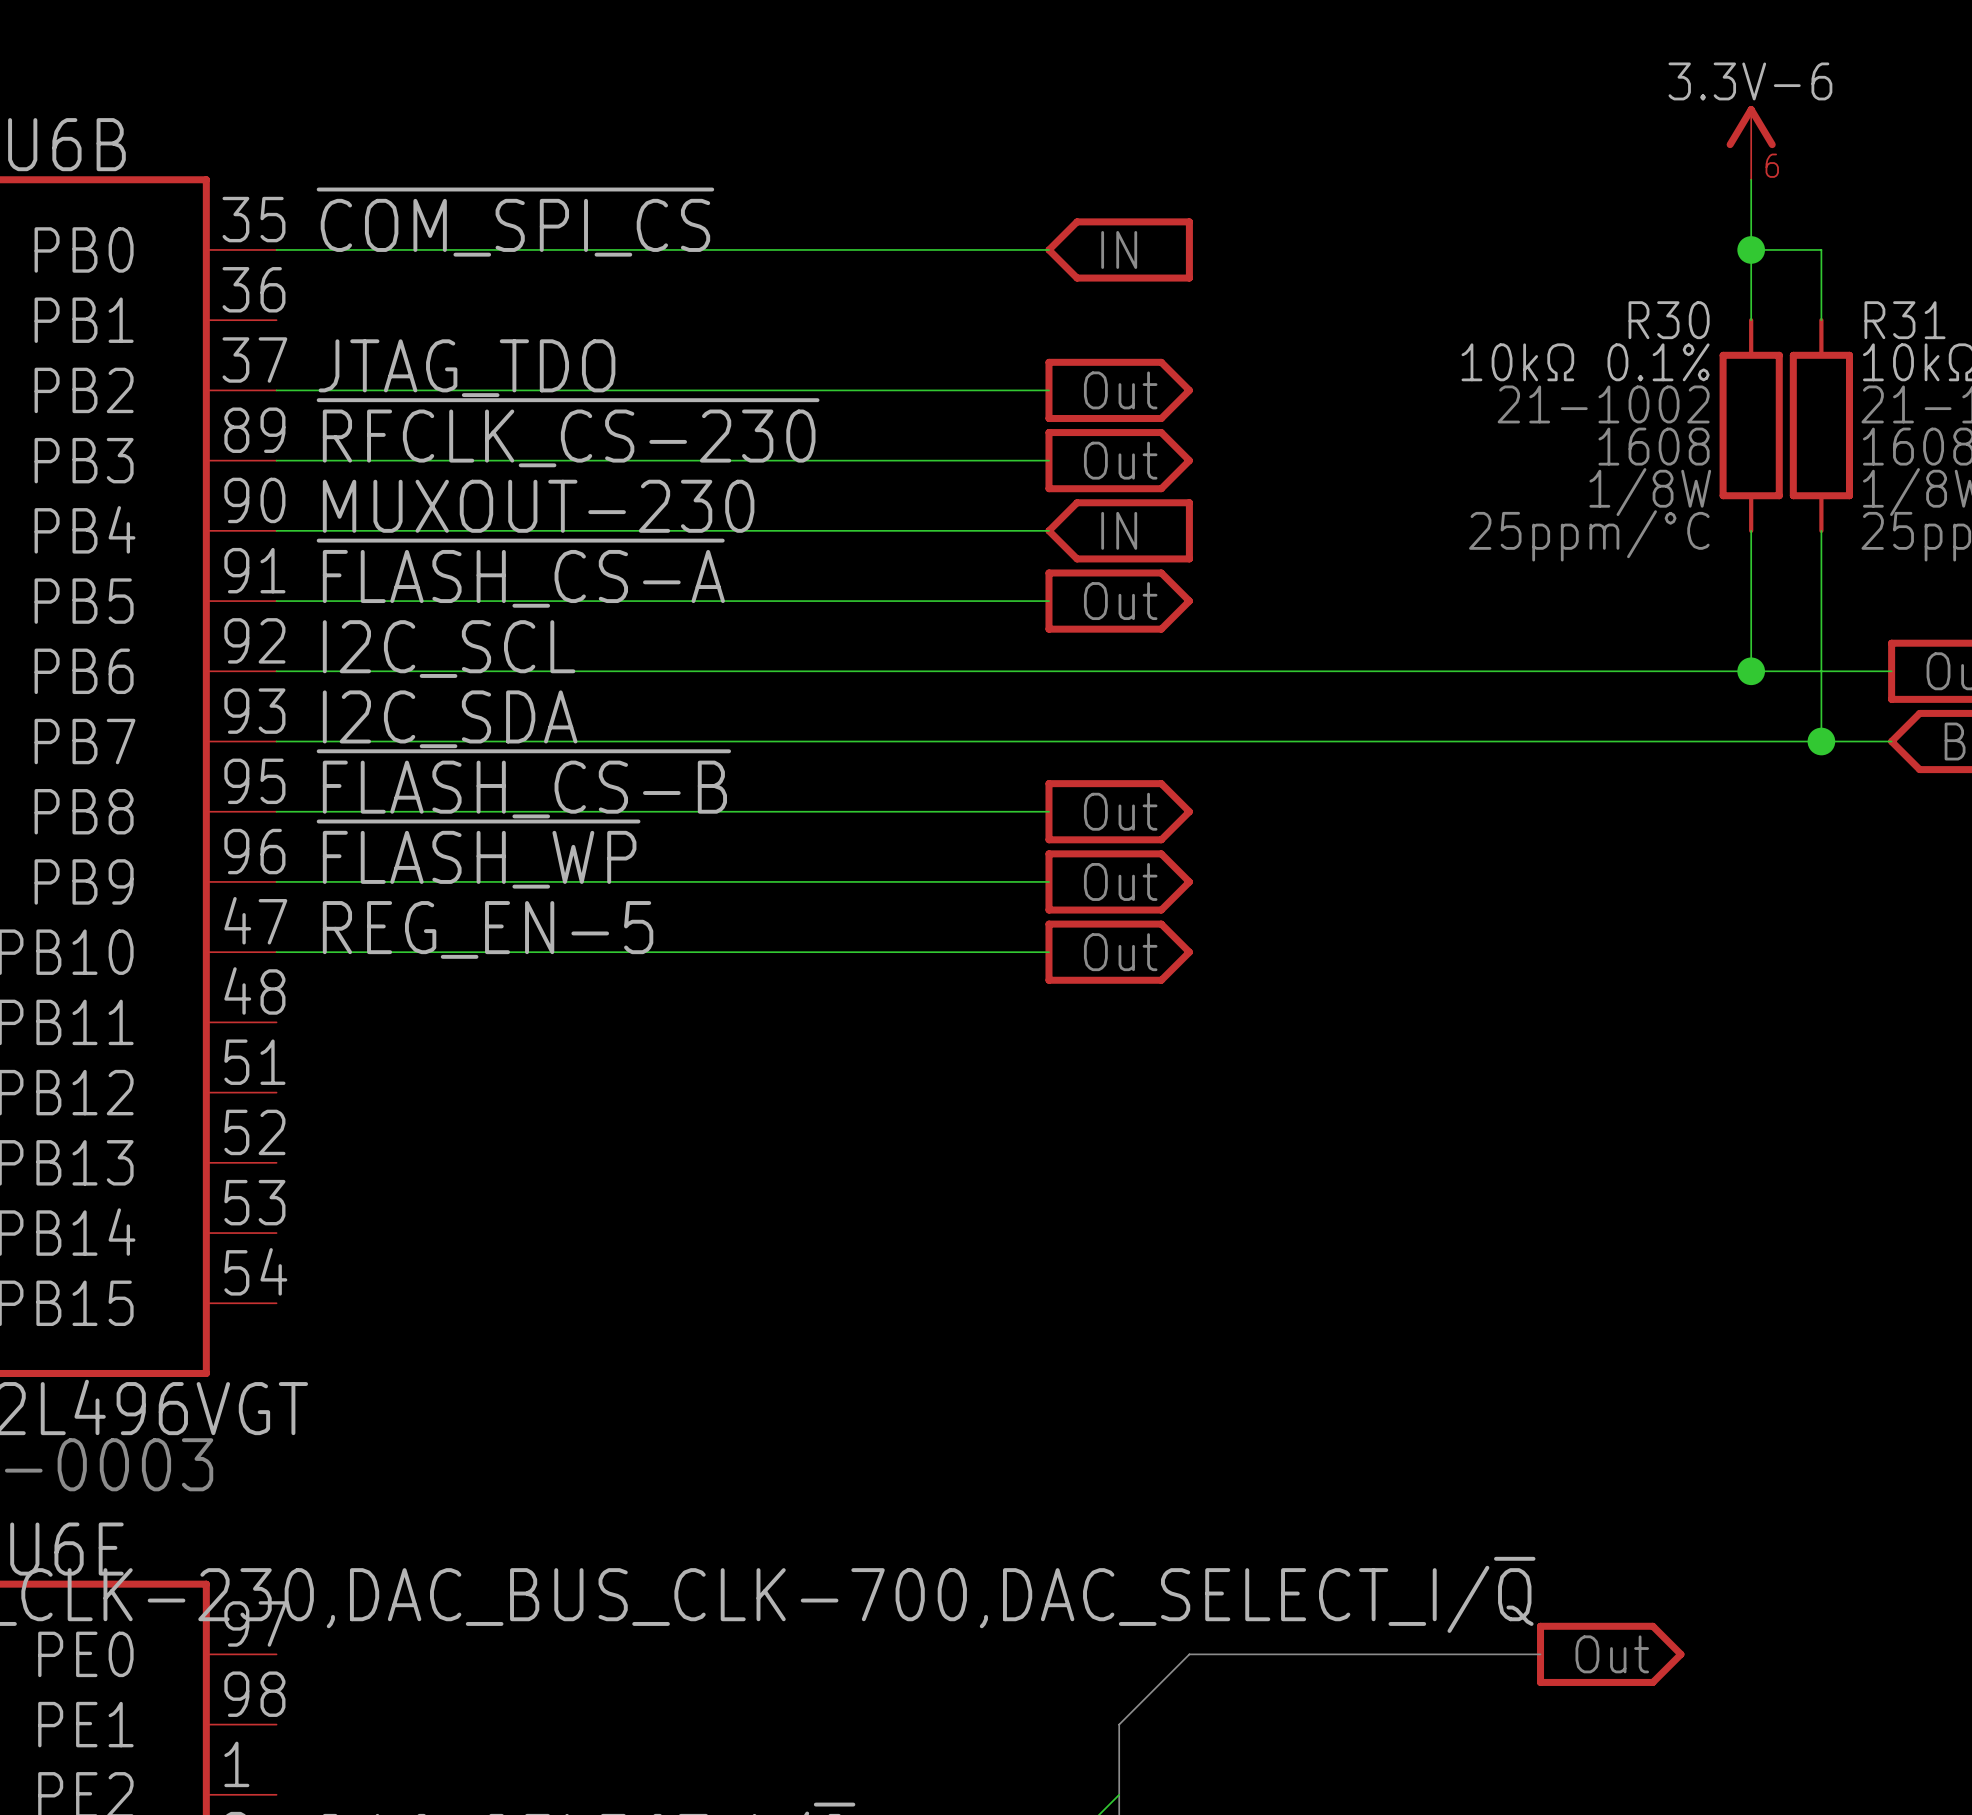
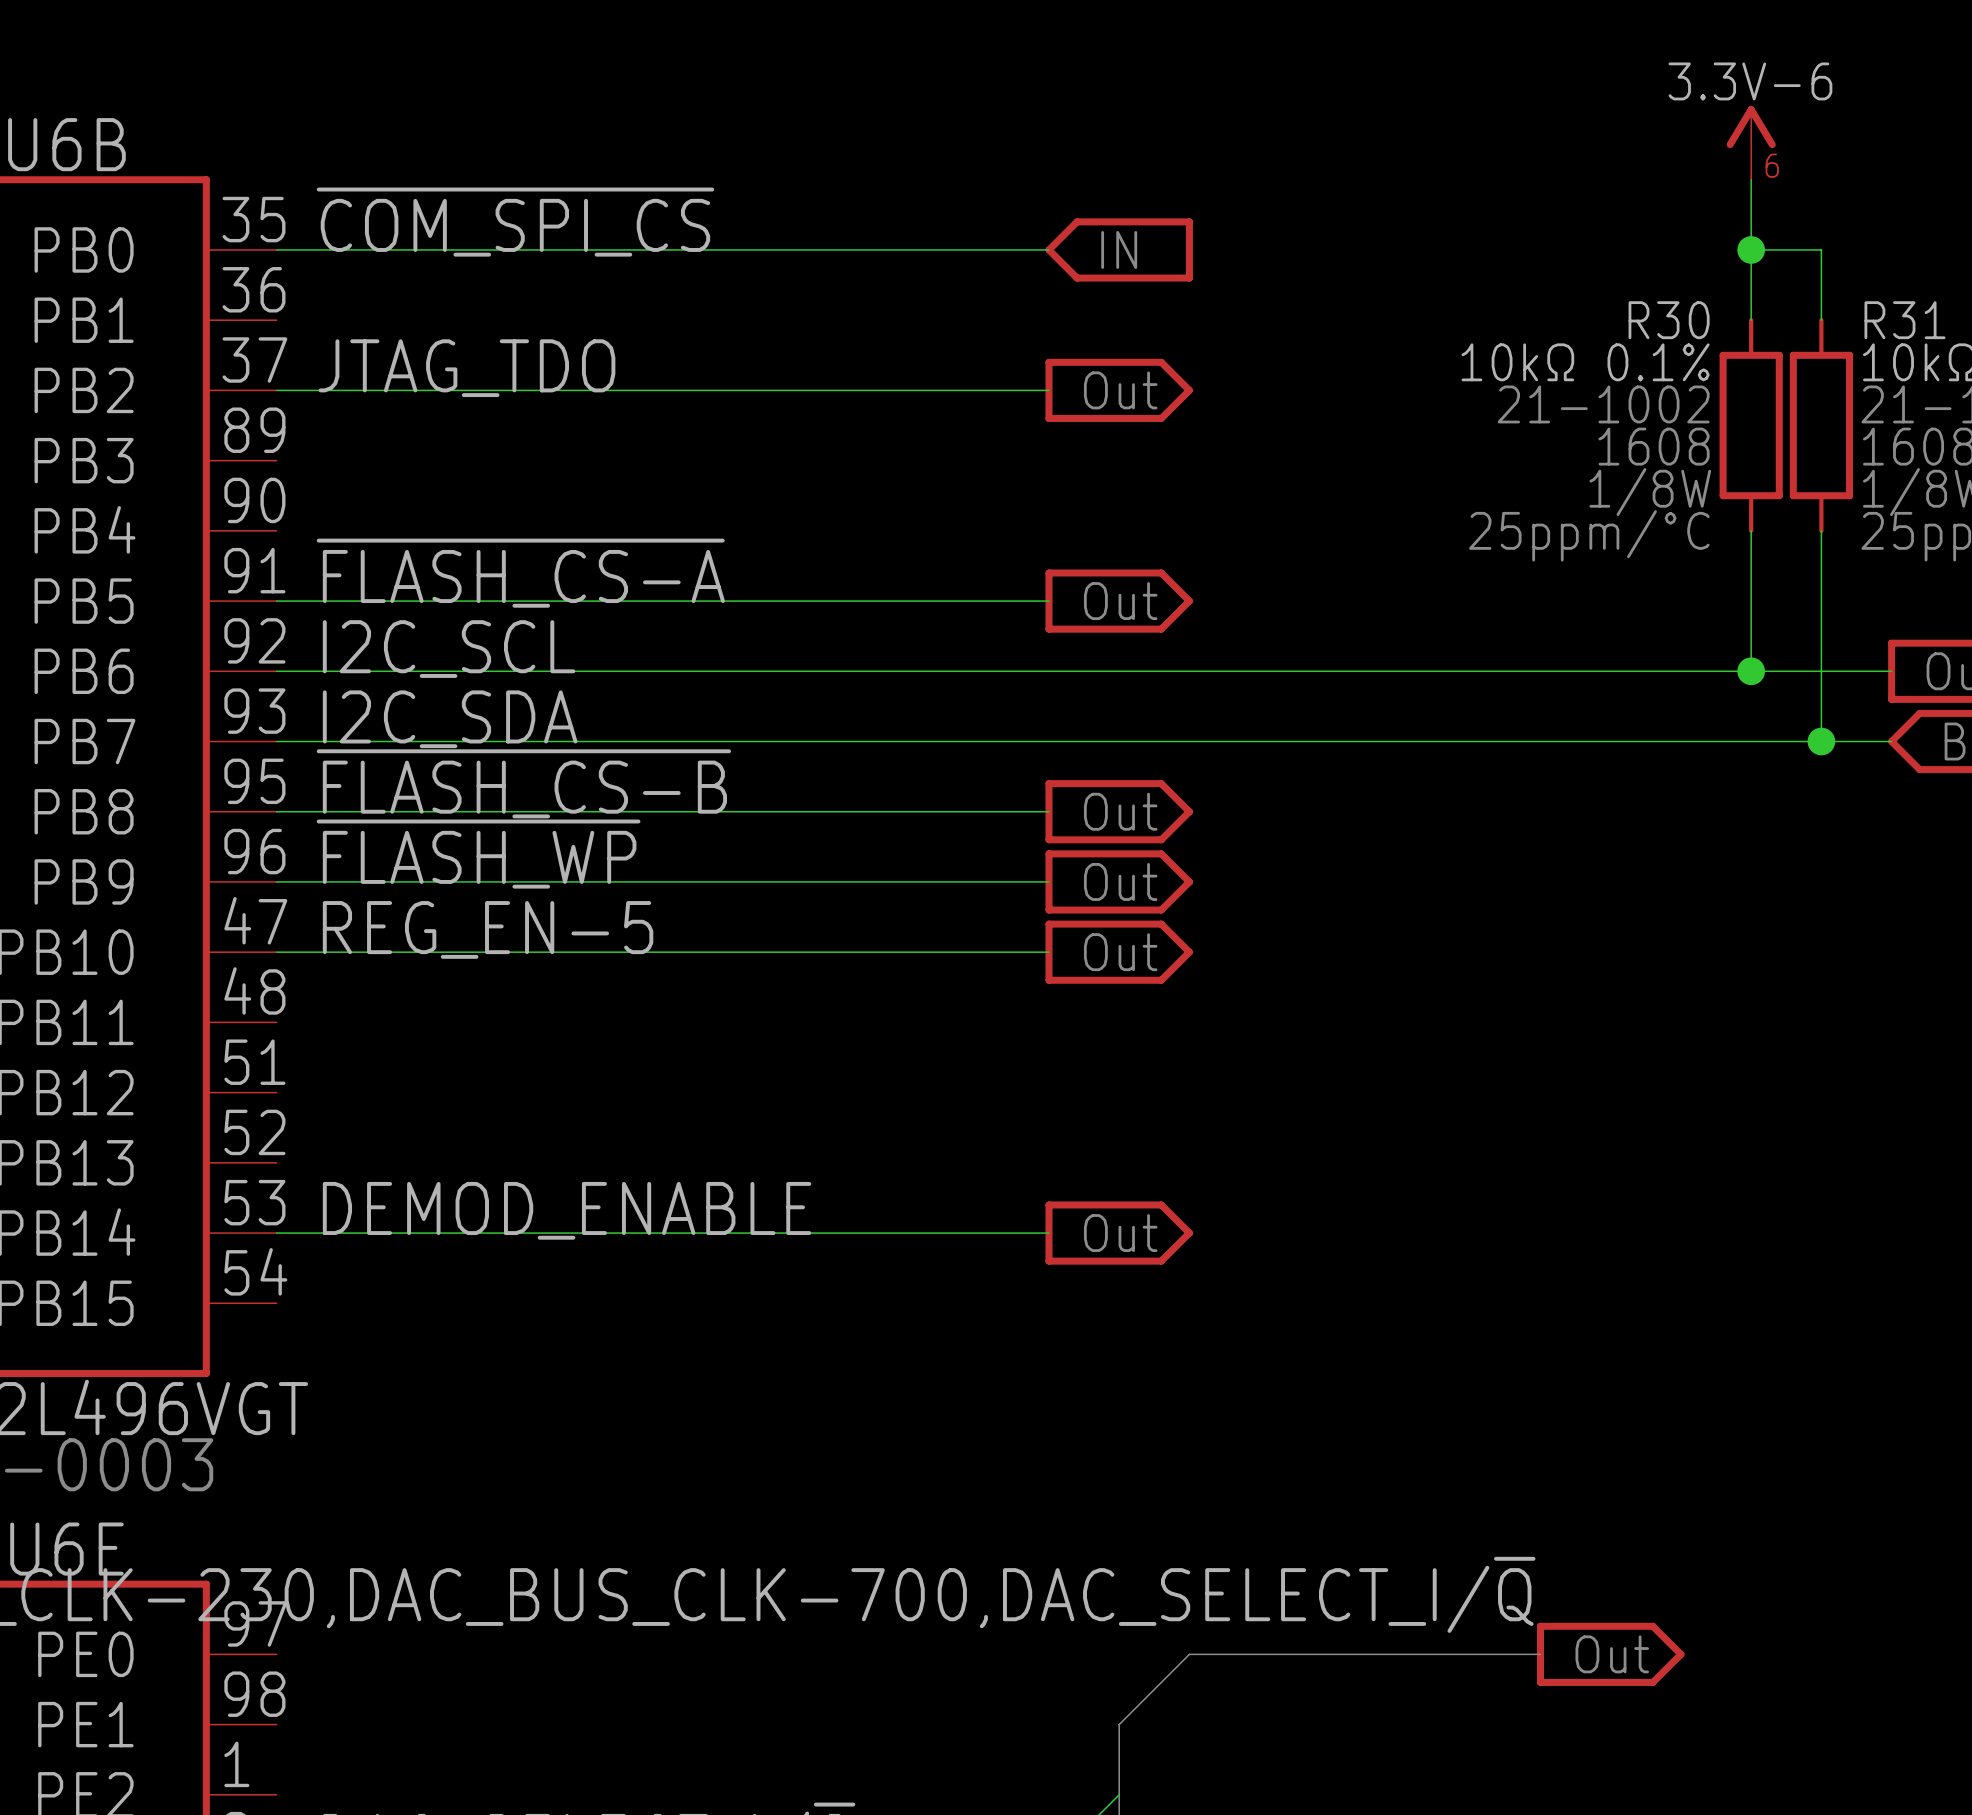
label: ~{RFCLK_CS-230} (568, 432) -> none
wire: (276, 460) (1048, 460) -> none
part: (1119, 460) -> none
label: MUXOUT-230 (538, 506) -> none
wire: (276, 530) (1048, 530) -> none
part: (1119, 530) -> none
label: none -> DEMOD_ENABLE (567, 1210)
wire: none -> (276, 1233) (1048, 1233)
part: none -> (1119, 1233)

